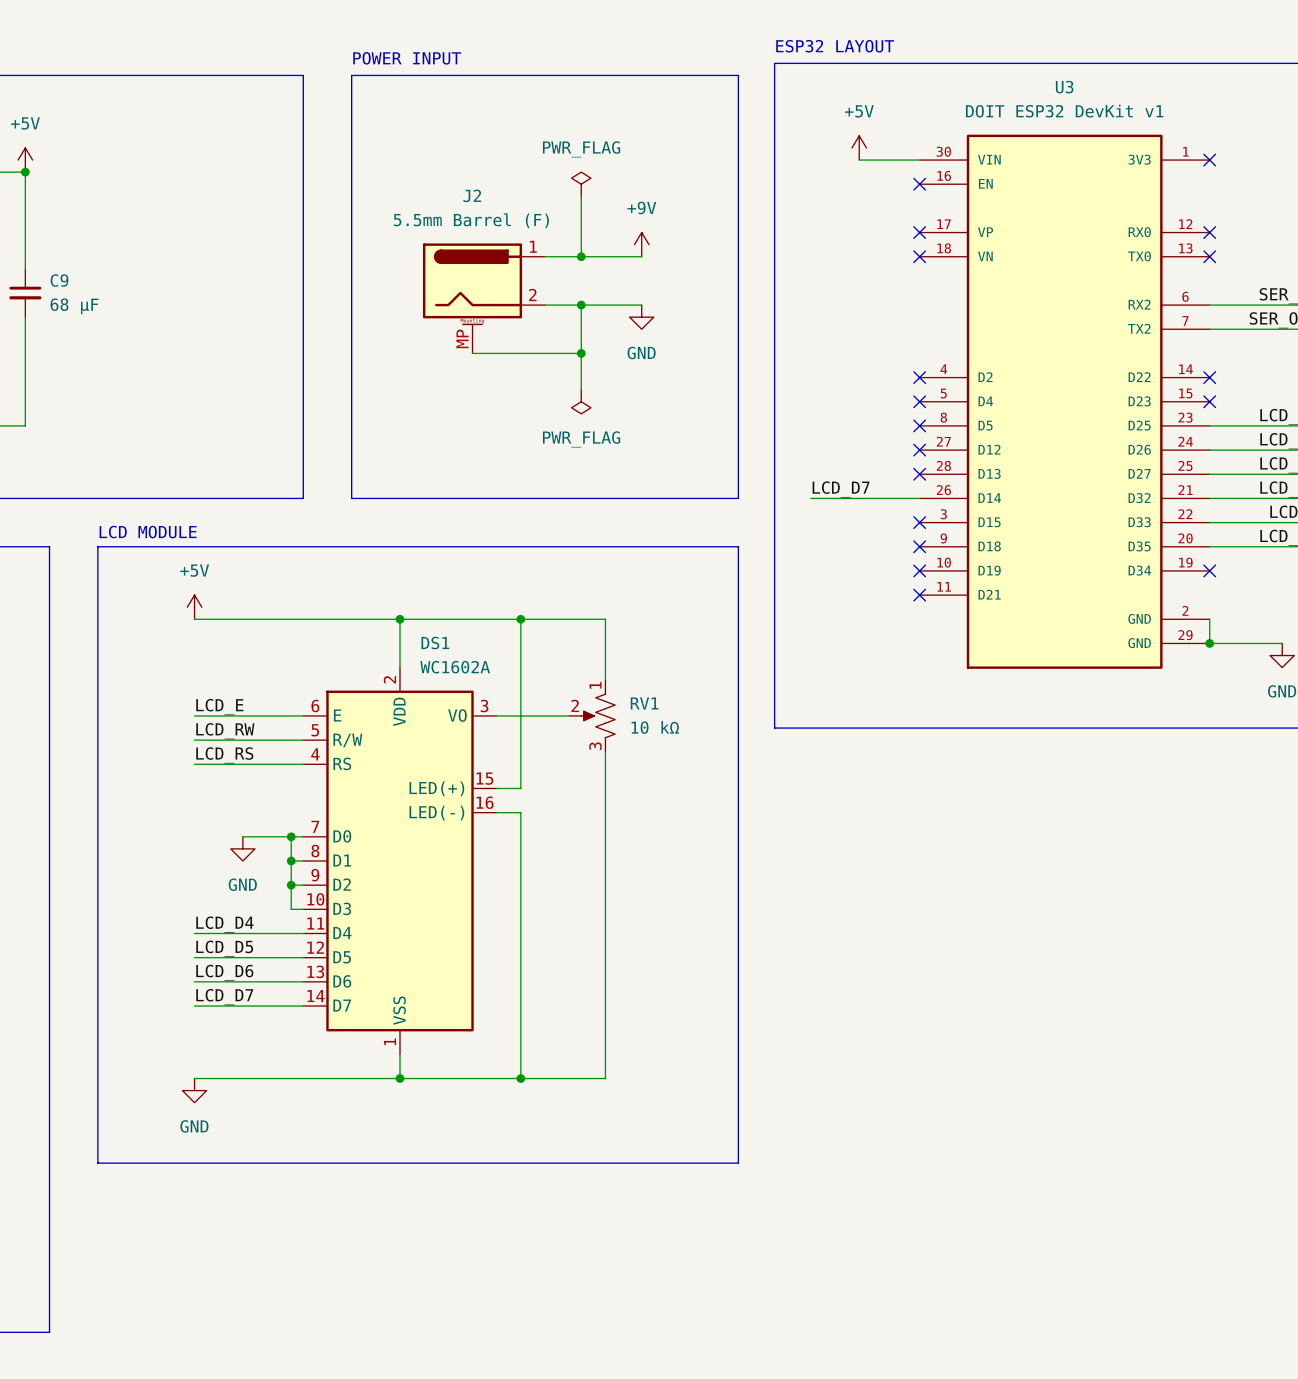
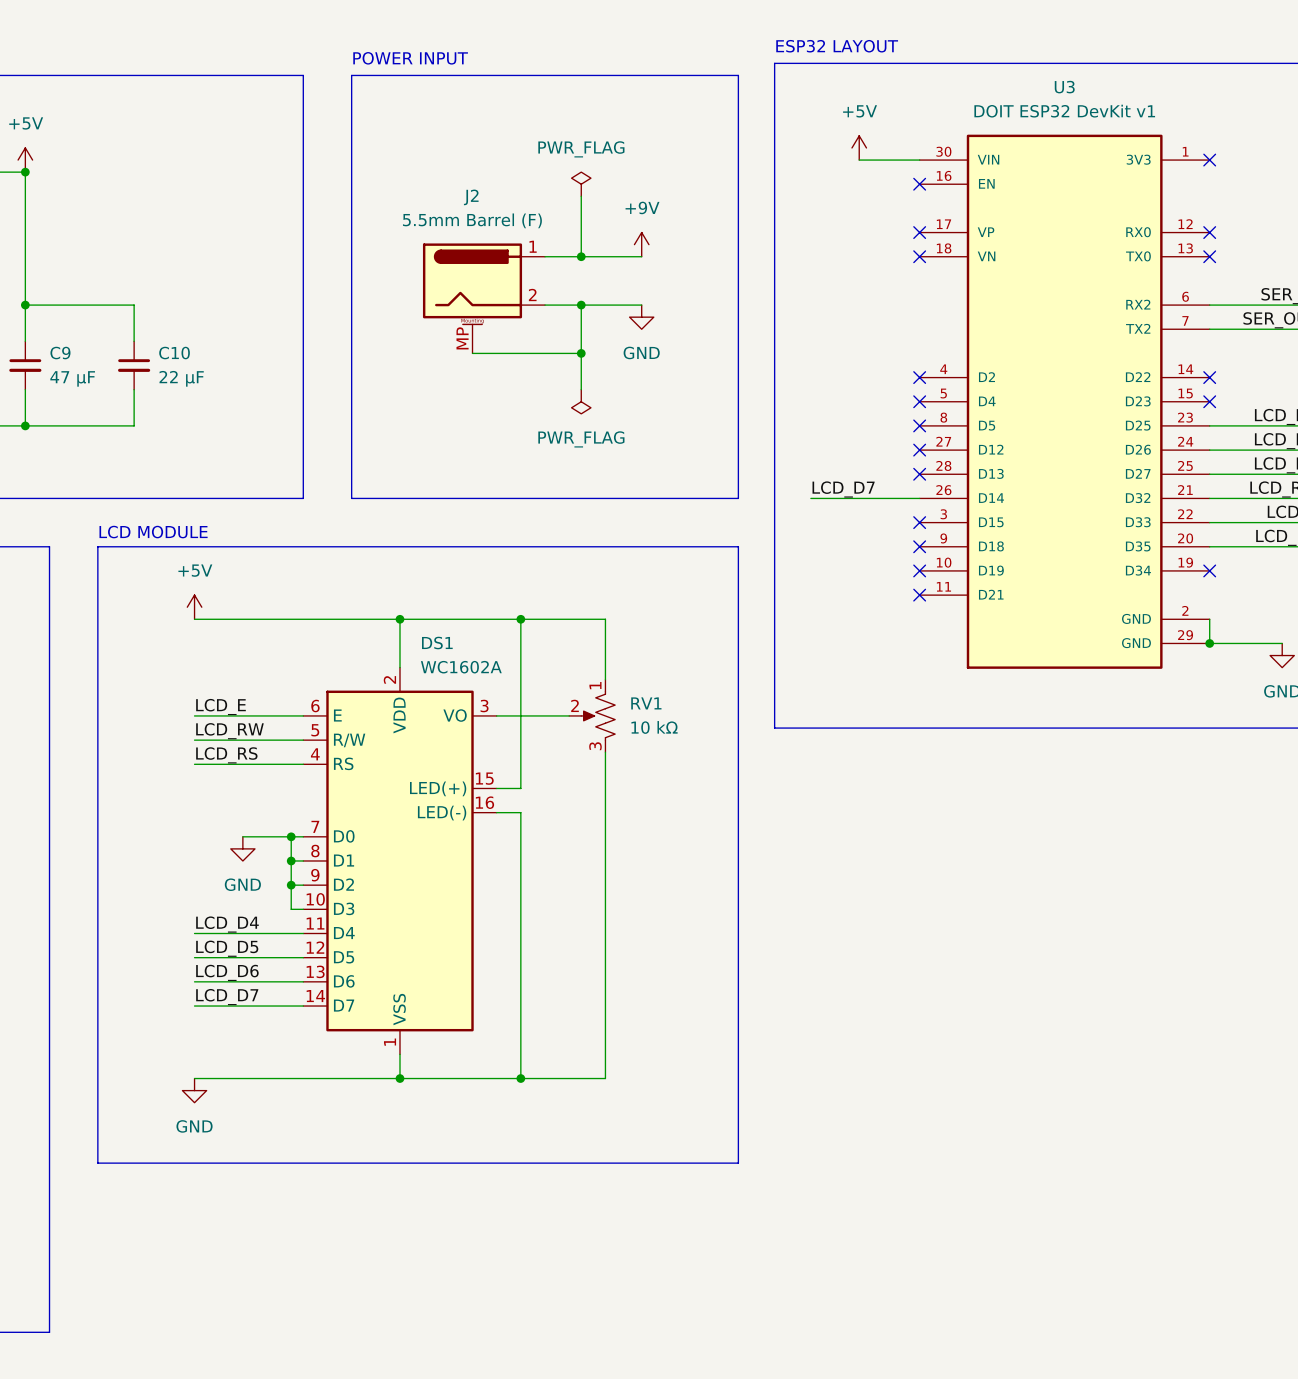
C9 position: (25, 292) -> (25, 365)
wire: none -> (25, 305) (134, 305) (134, 341)
junction: none -> (25, 305)
C9 value: 68 μF (74, 306) -> 47 μF (72, 378)
C10: none -> 22 μF (134, 365)
wire: none -> (134, 389) (134, 425) (25, 425)
junction: none -> (25, 425)

